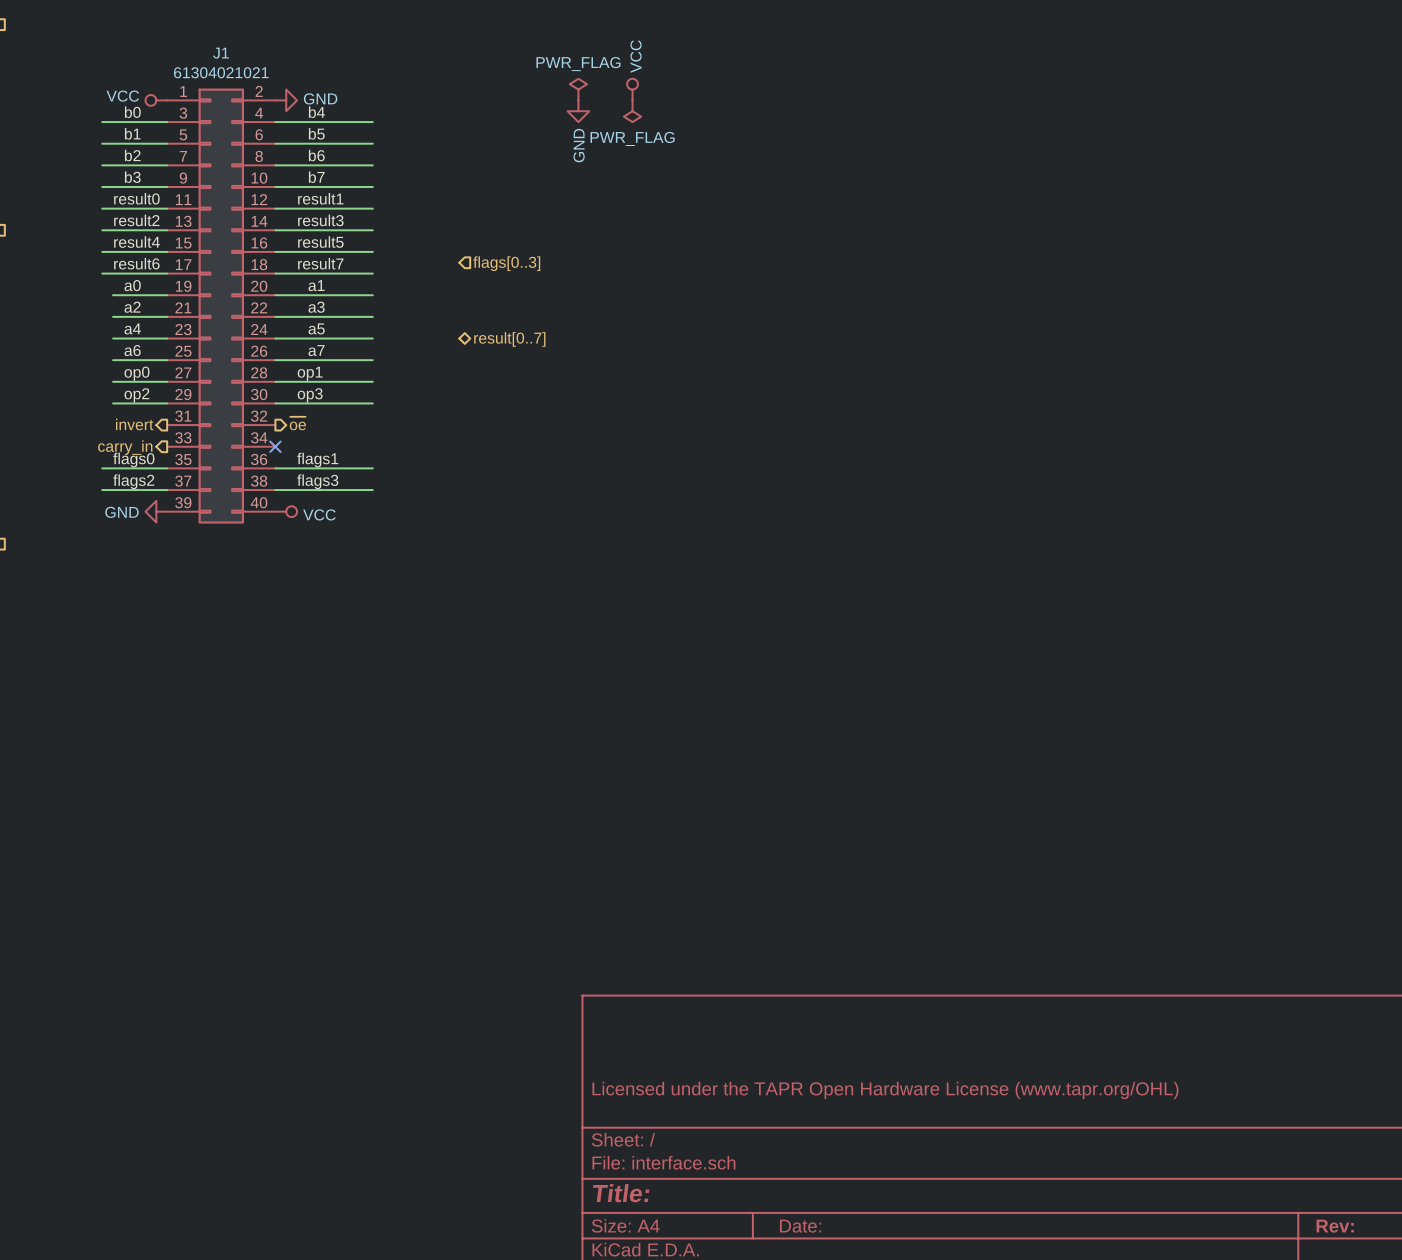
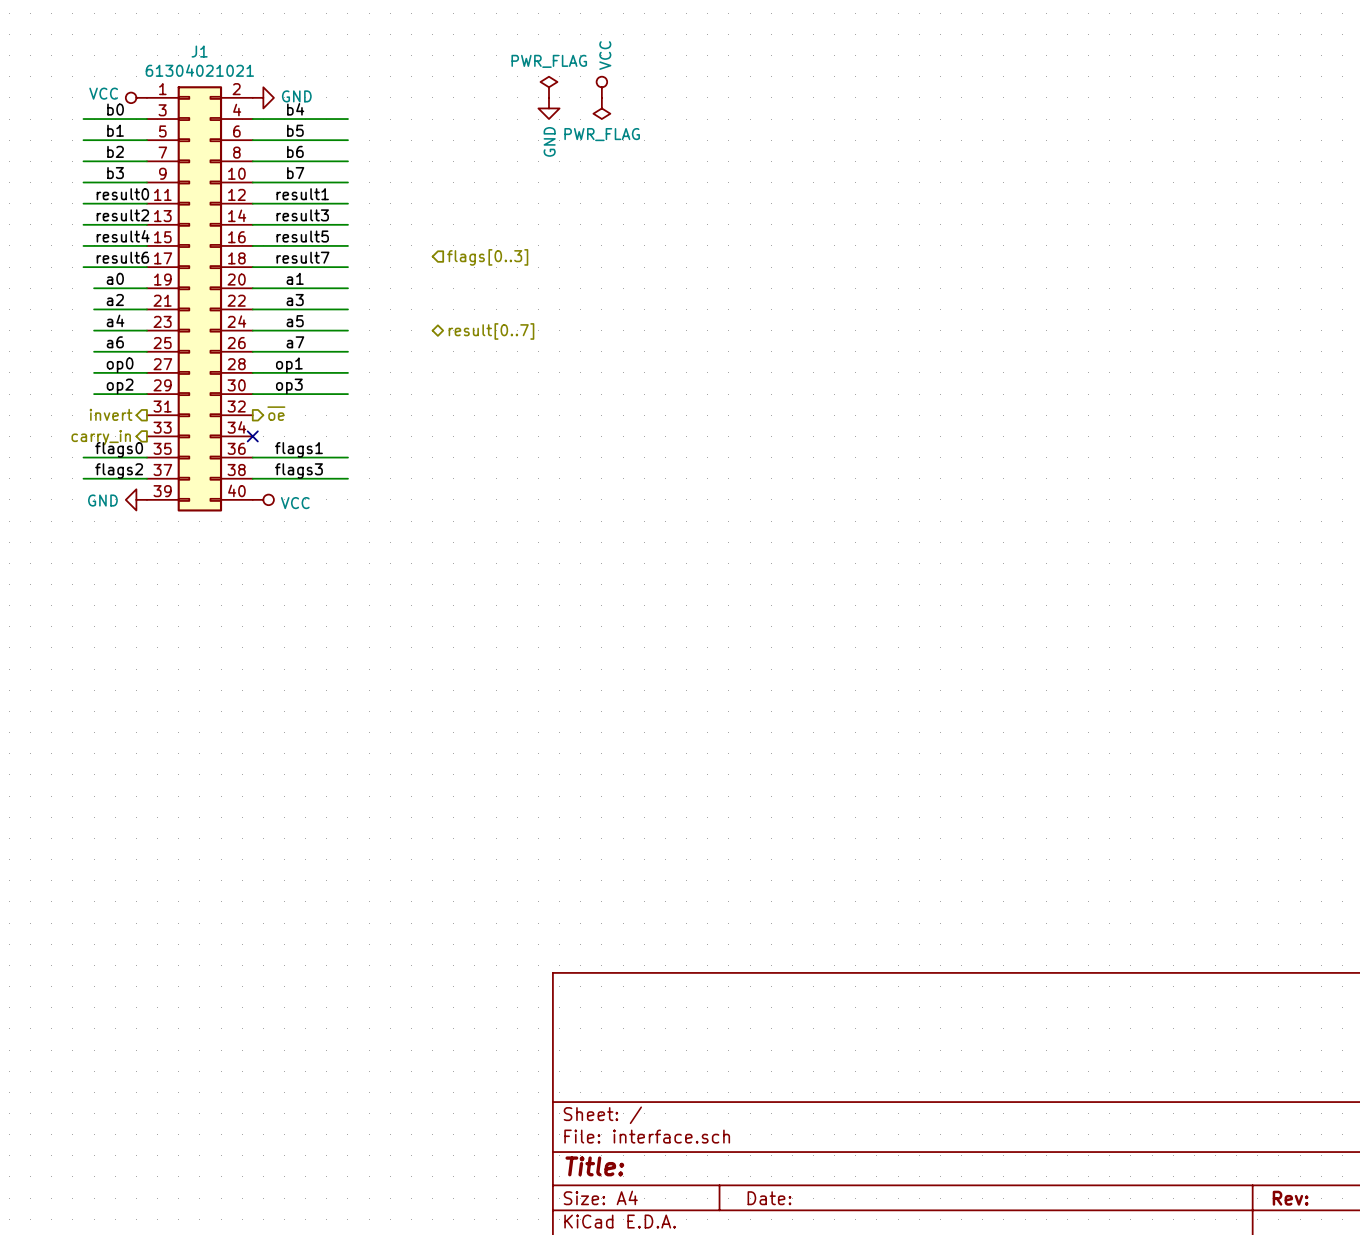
title block: Licensed under the TAPR Open Hardware License (www.tapr.org/OHL) (885, 1090) -> none

